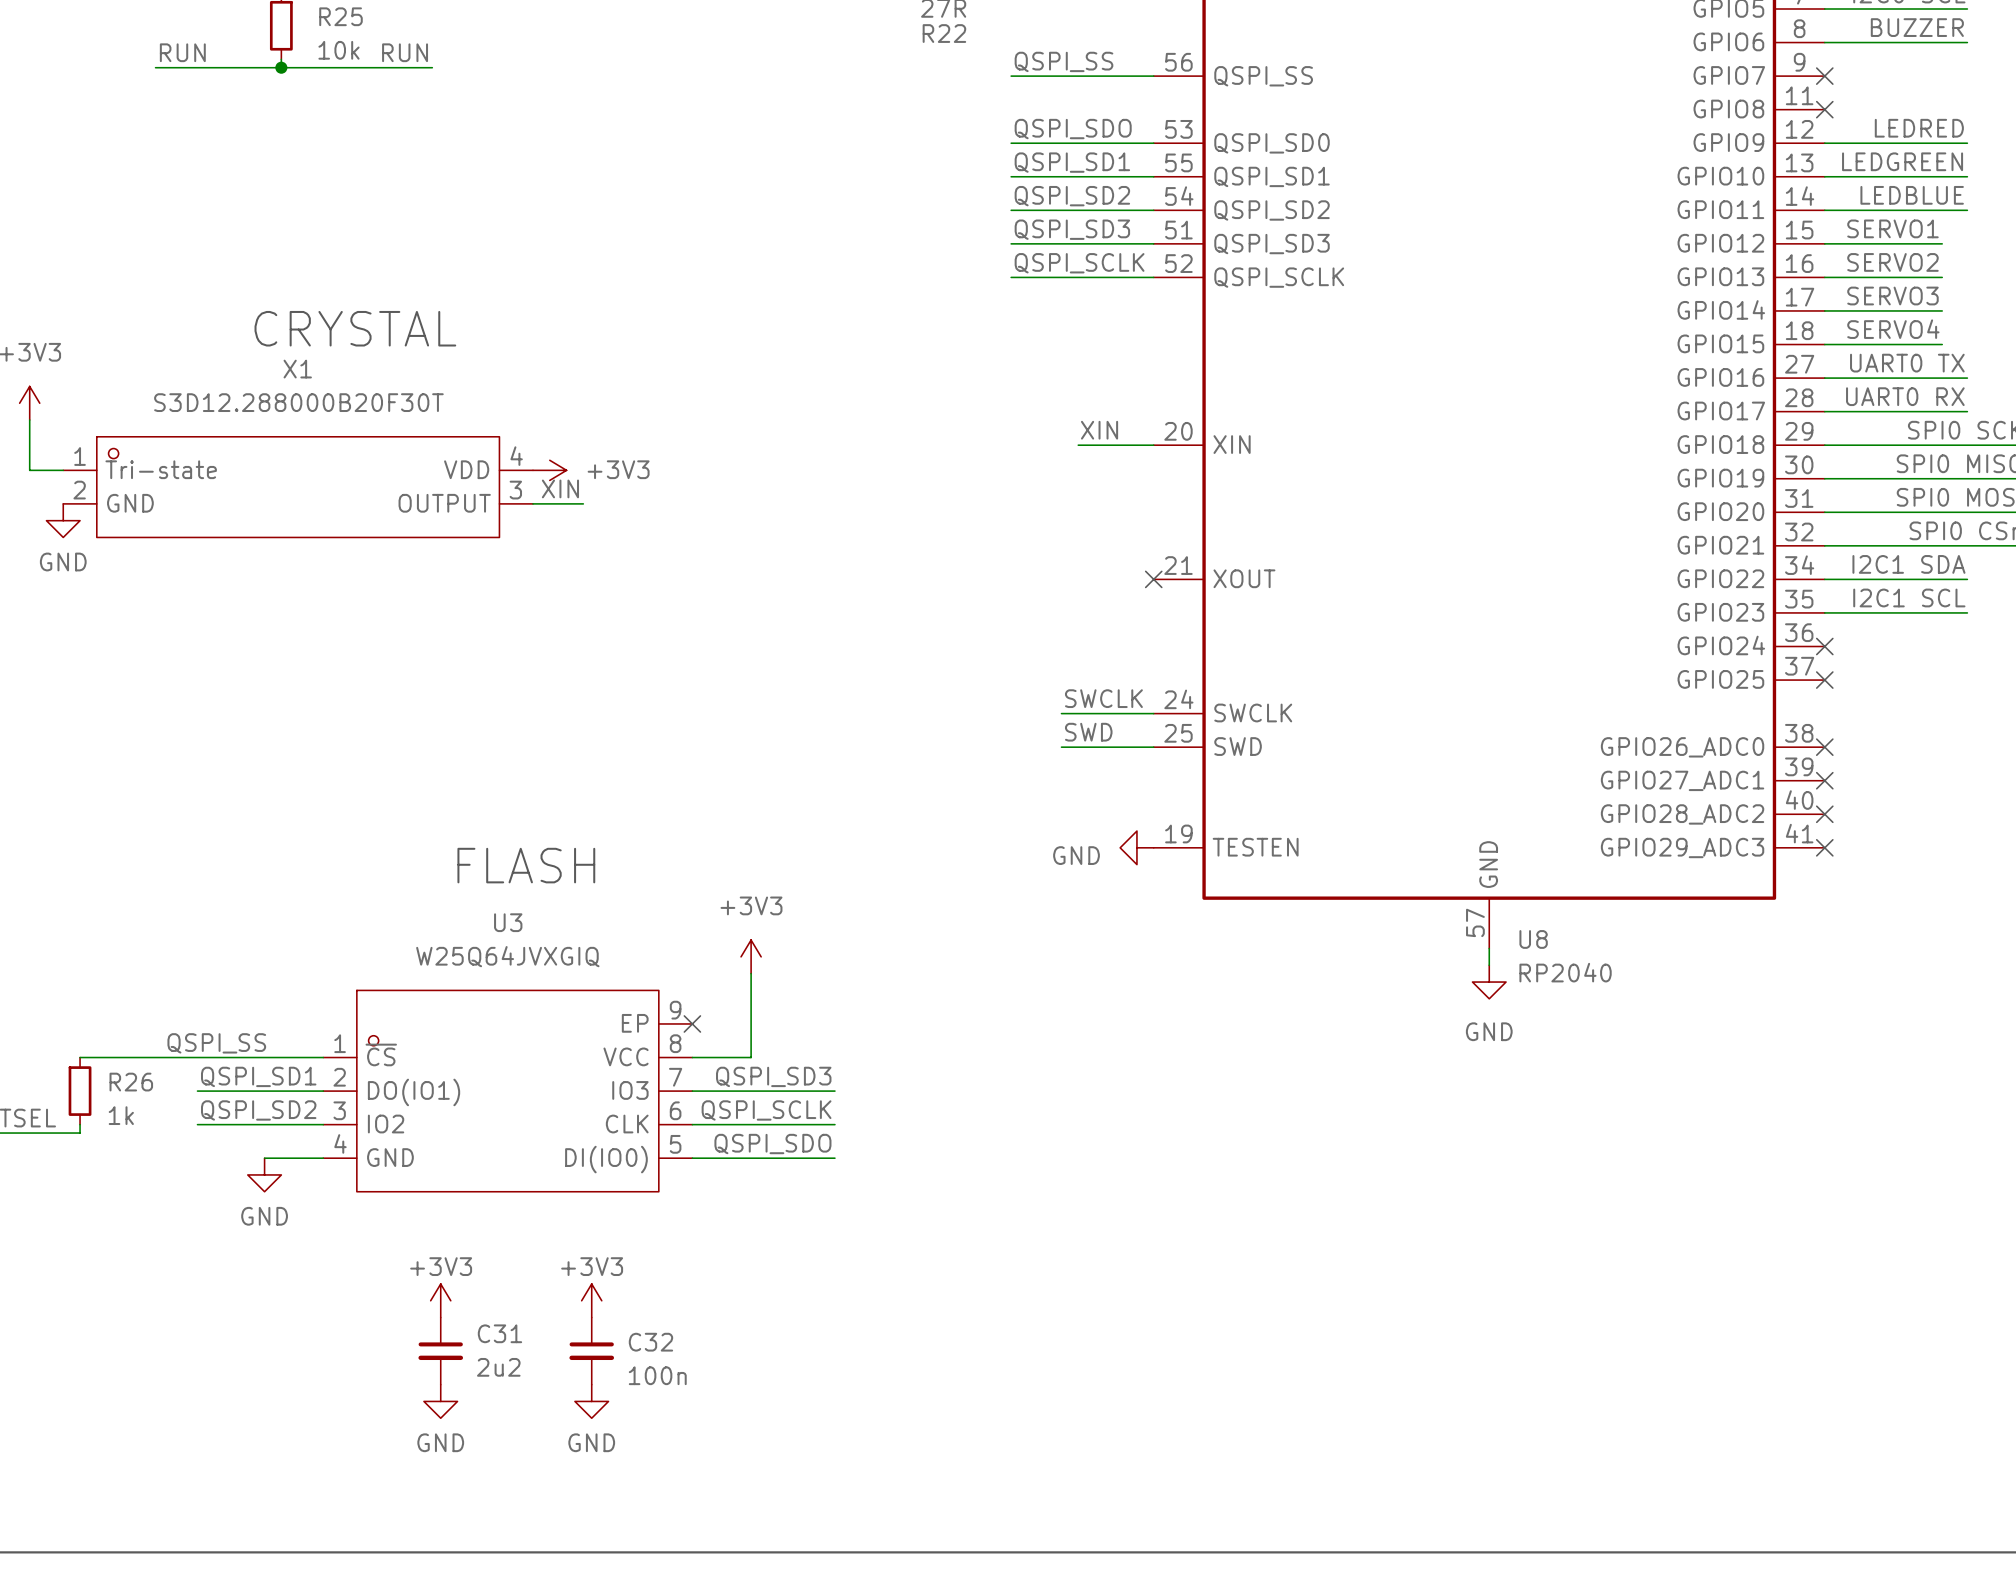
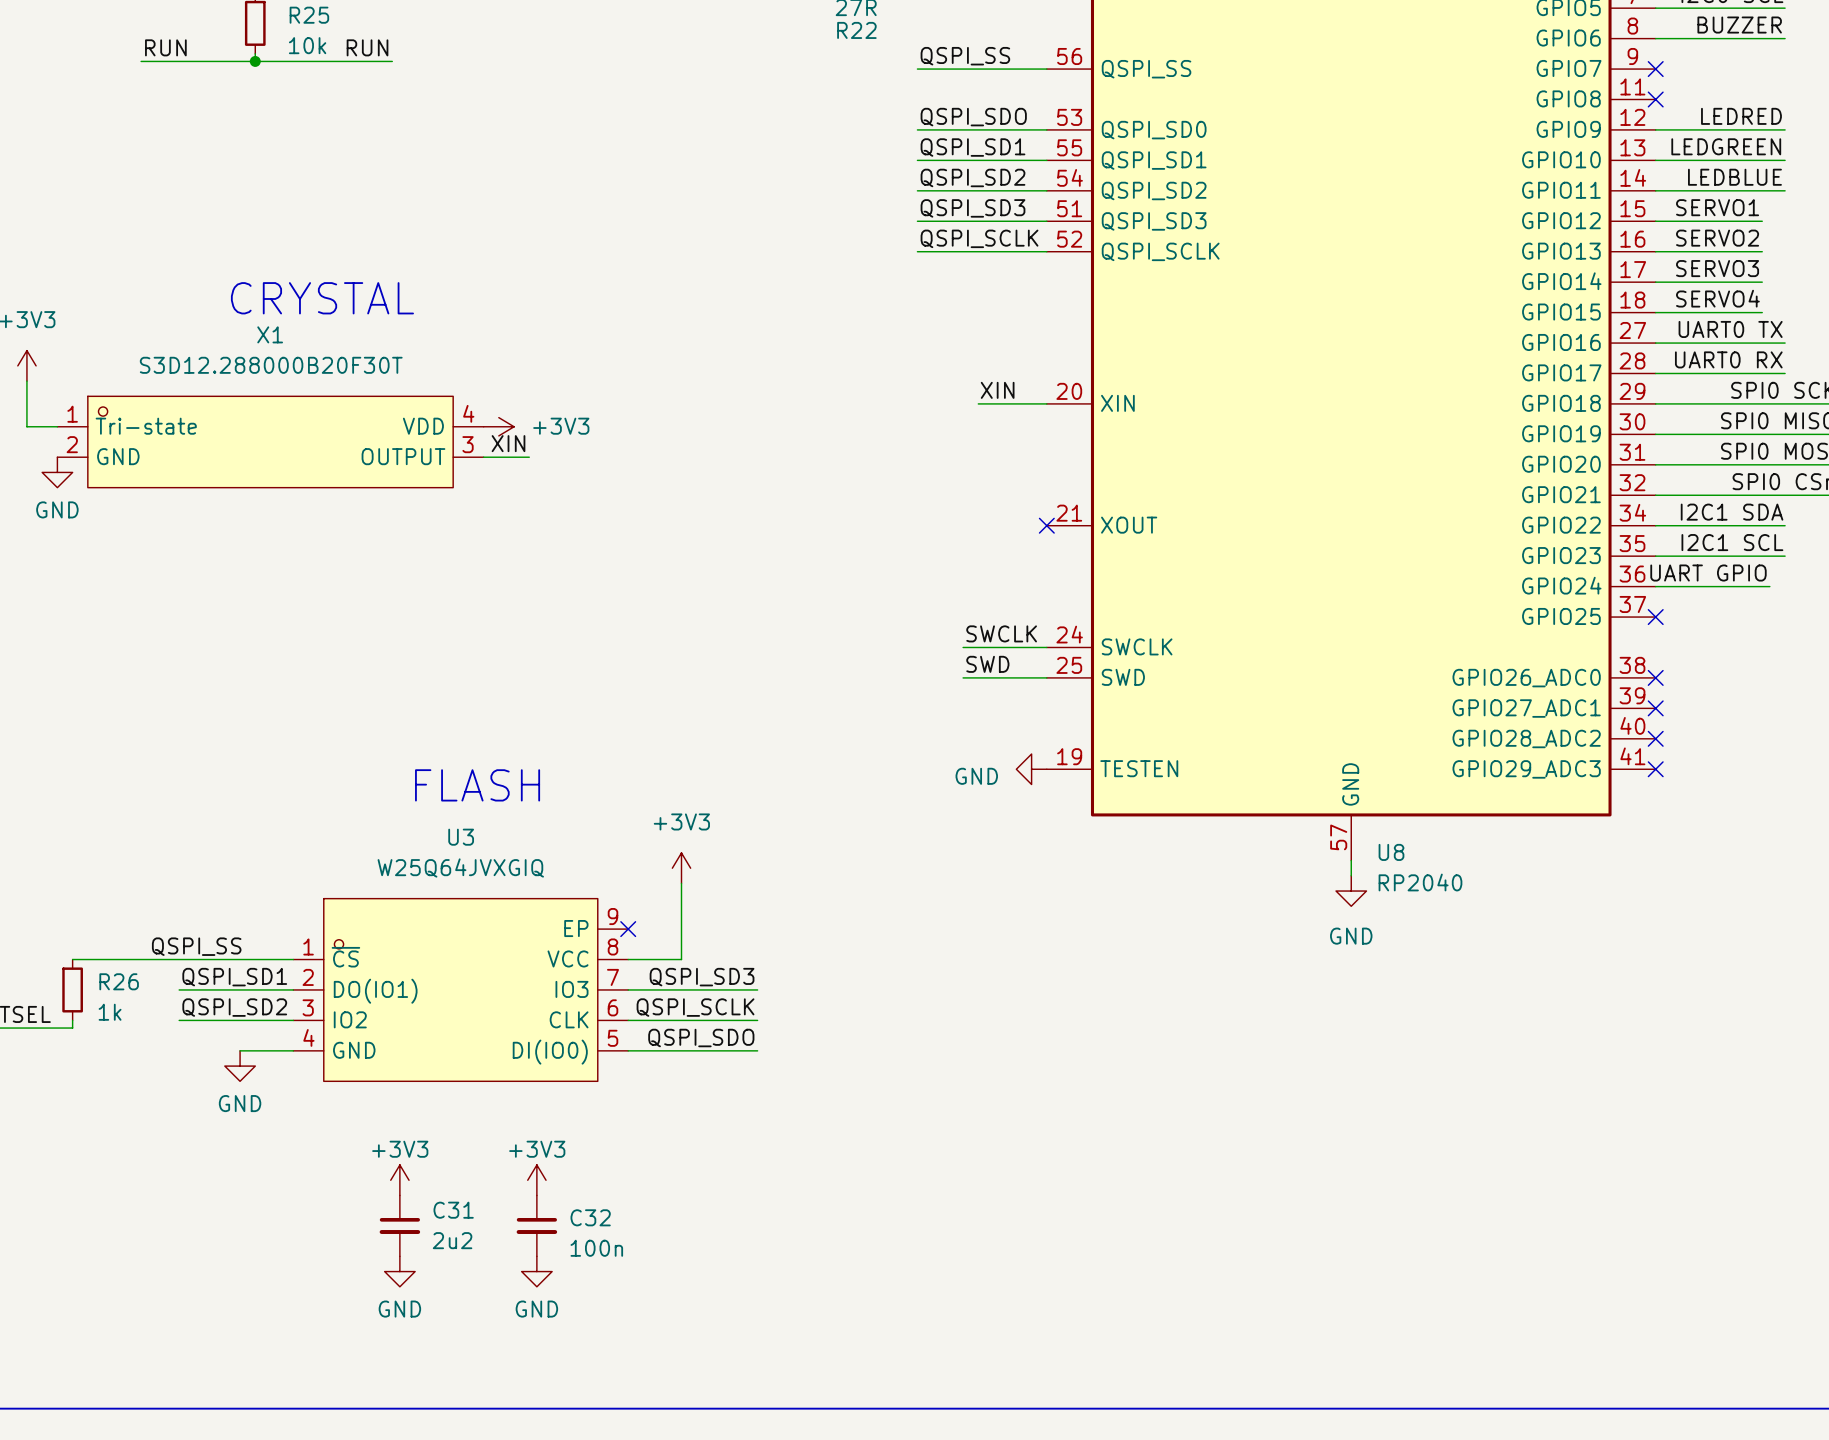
label: none -> UART GPIO (1708, 573)
wire: none -> (1655, 586) (1769, 586)
no-connect mark: (1824, 646) -> none

